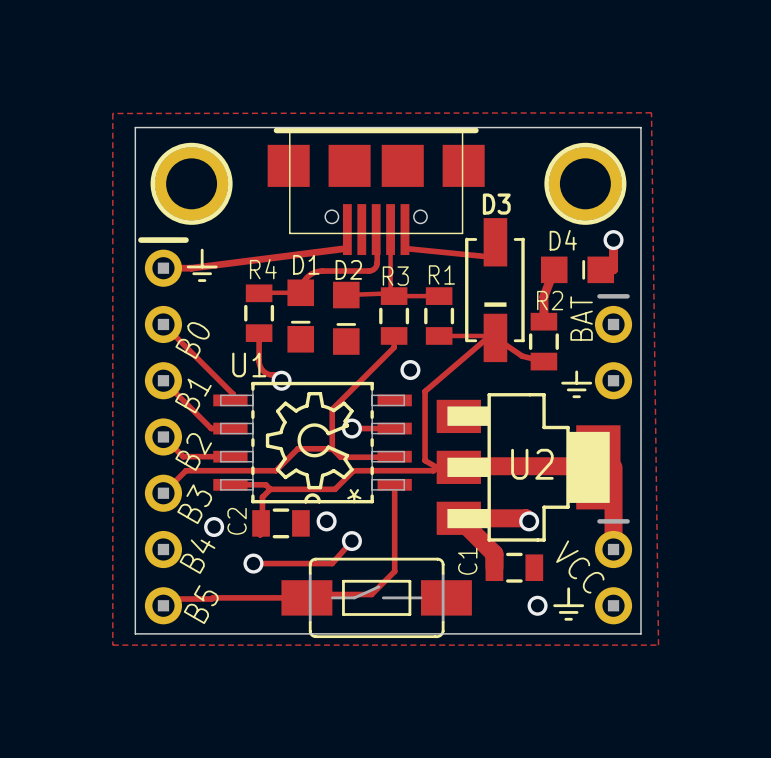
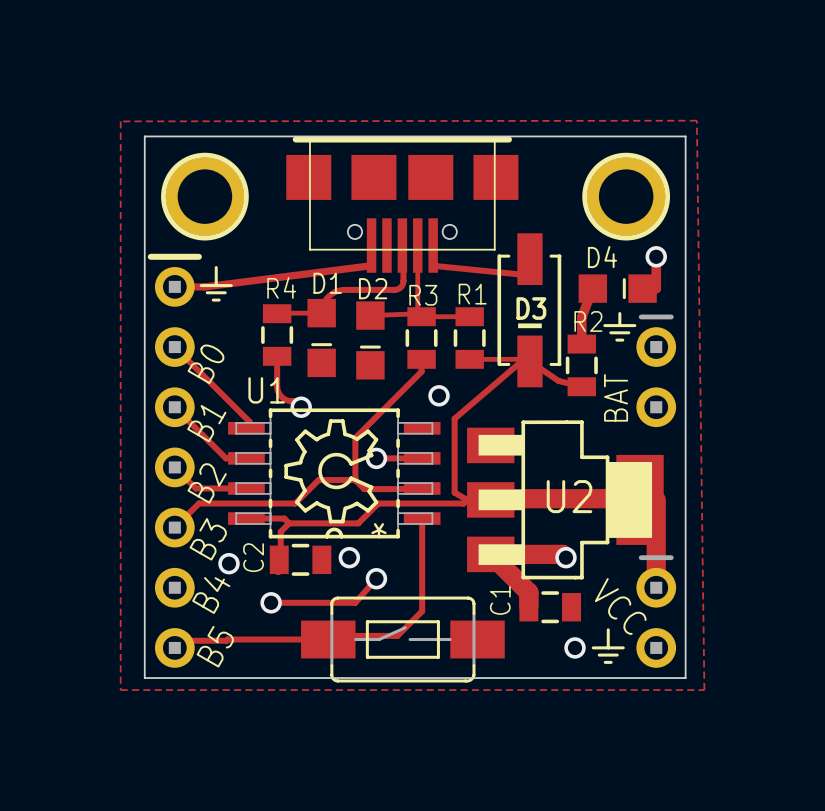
D3 name position: D3 (496, 204) -> D3 (531, 308)
text position: BAT (581, 318) -> BAT (616, 397)
line: (576, 371) (576, 383) -> (619, 313) (619, 325)
line: (562, 383) (590, 383) -> (604, 325) (634, 325)
line: (568, 389) (585, 389) -> (610, 332) (628, 332)
line: (573, 396) (579, 396) -> (616, 340) (622, 340)

